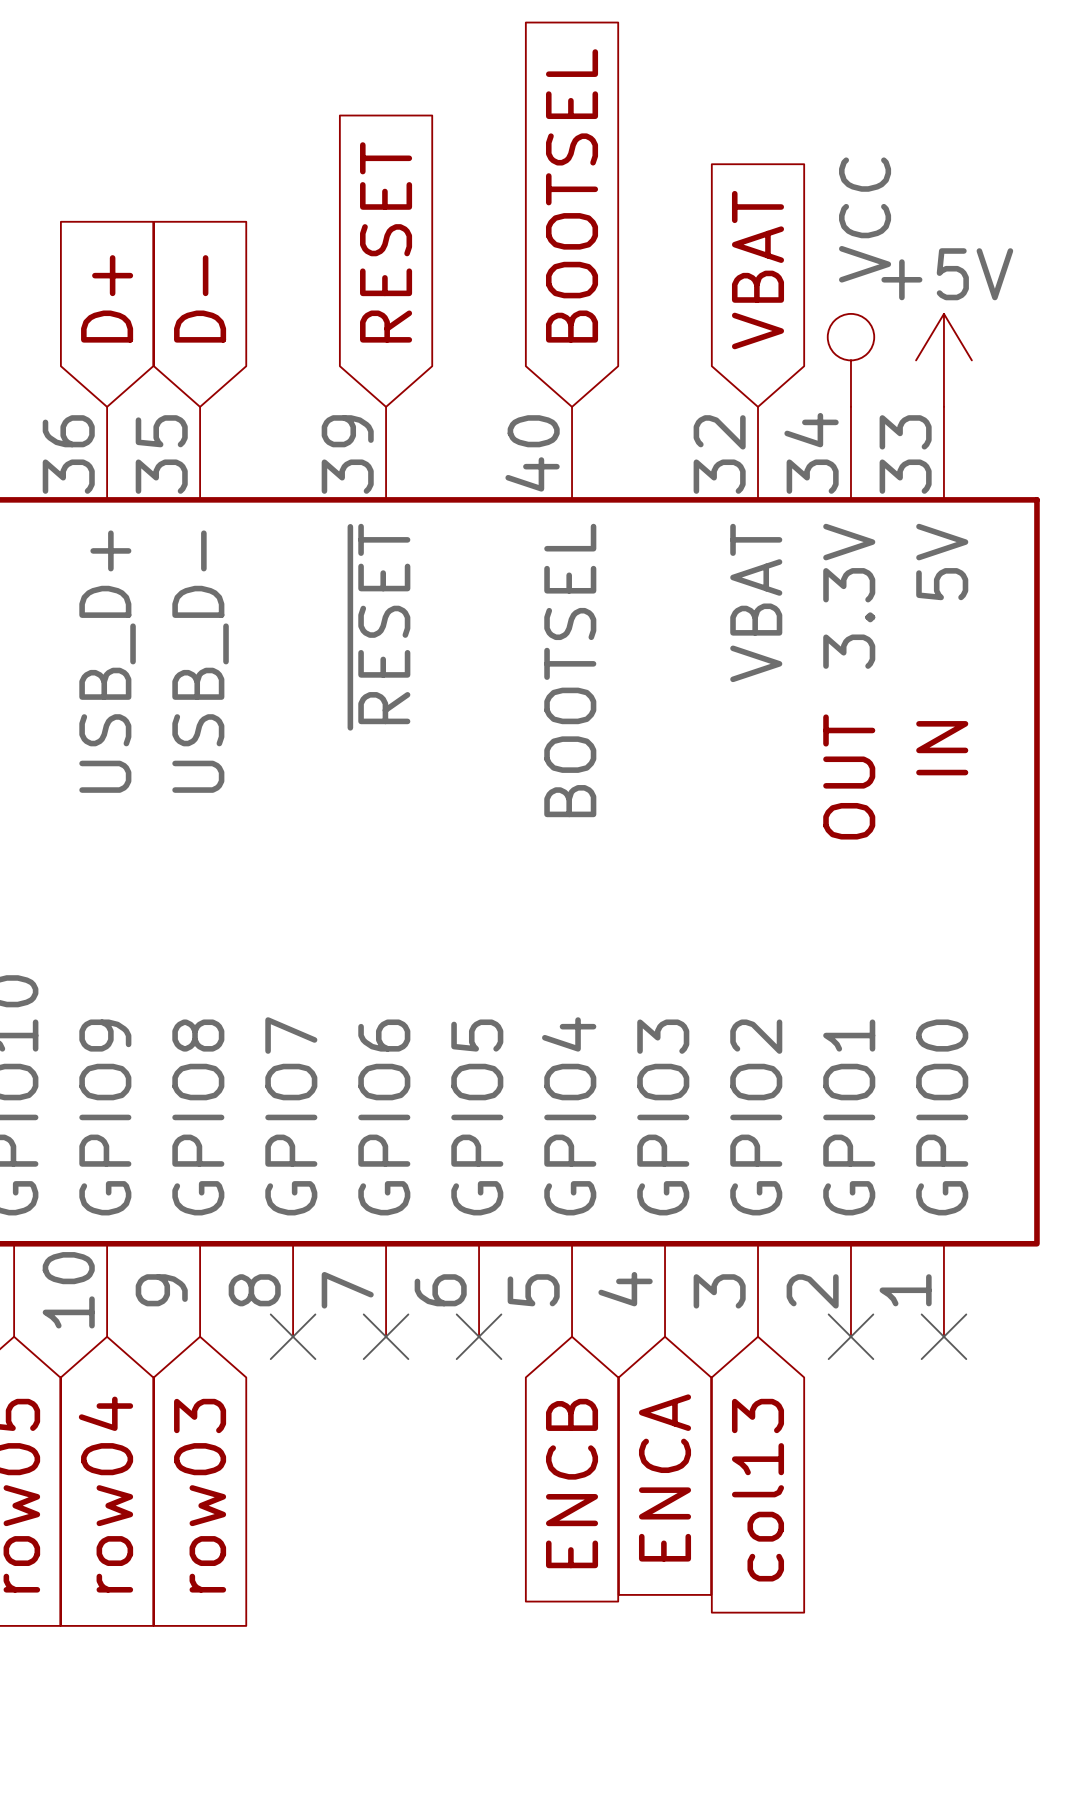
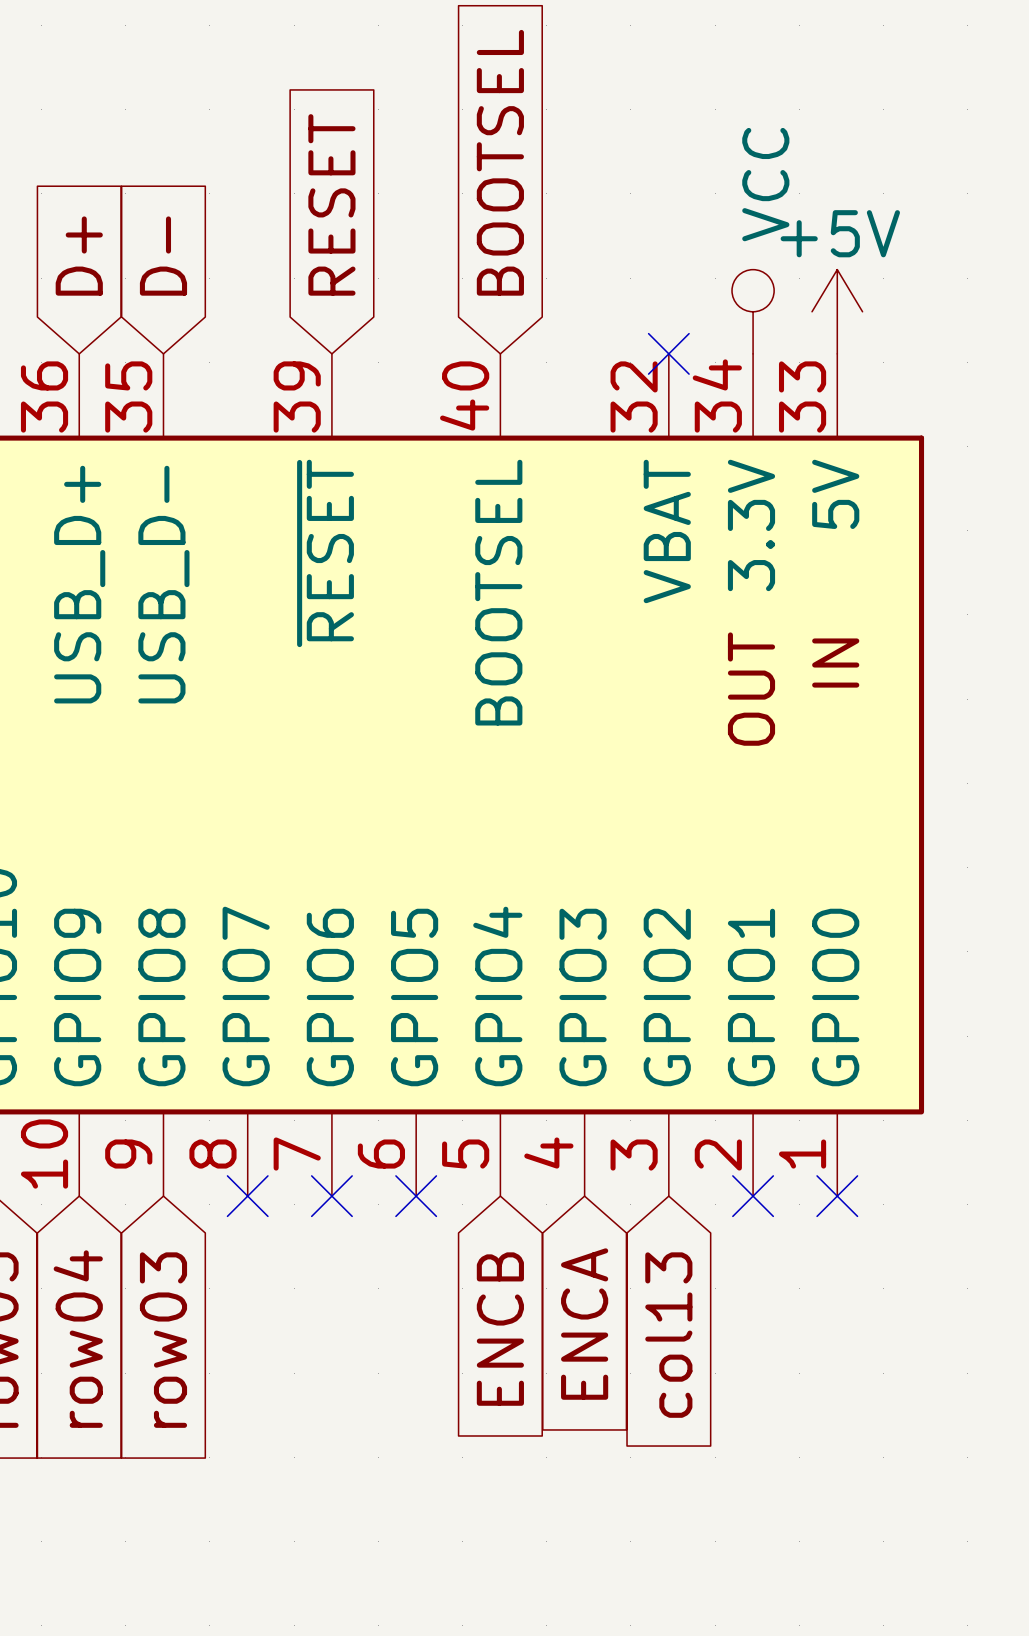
global label: VBAT (758, 270) -> none
no-connect mark: none -> (668, 353)

